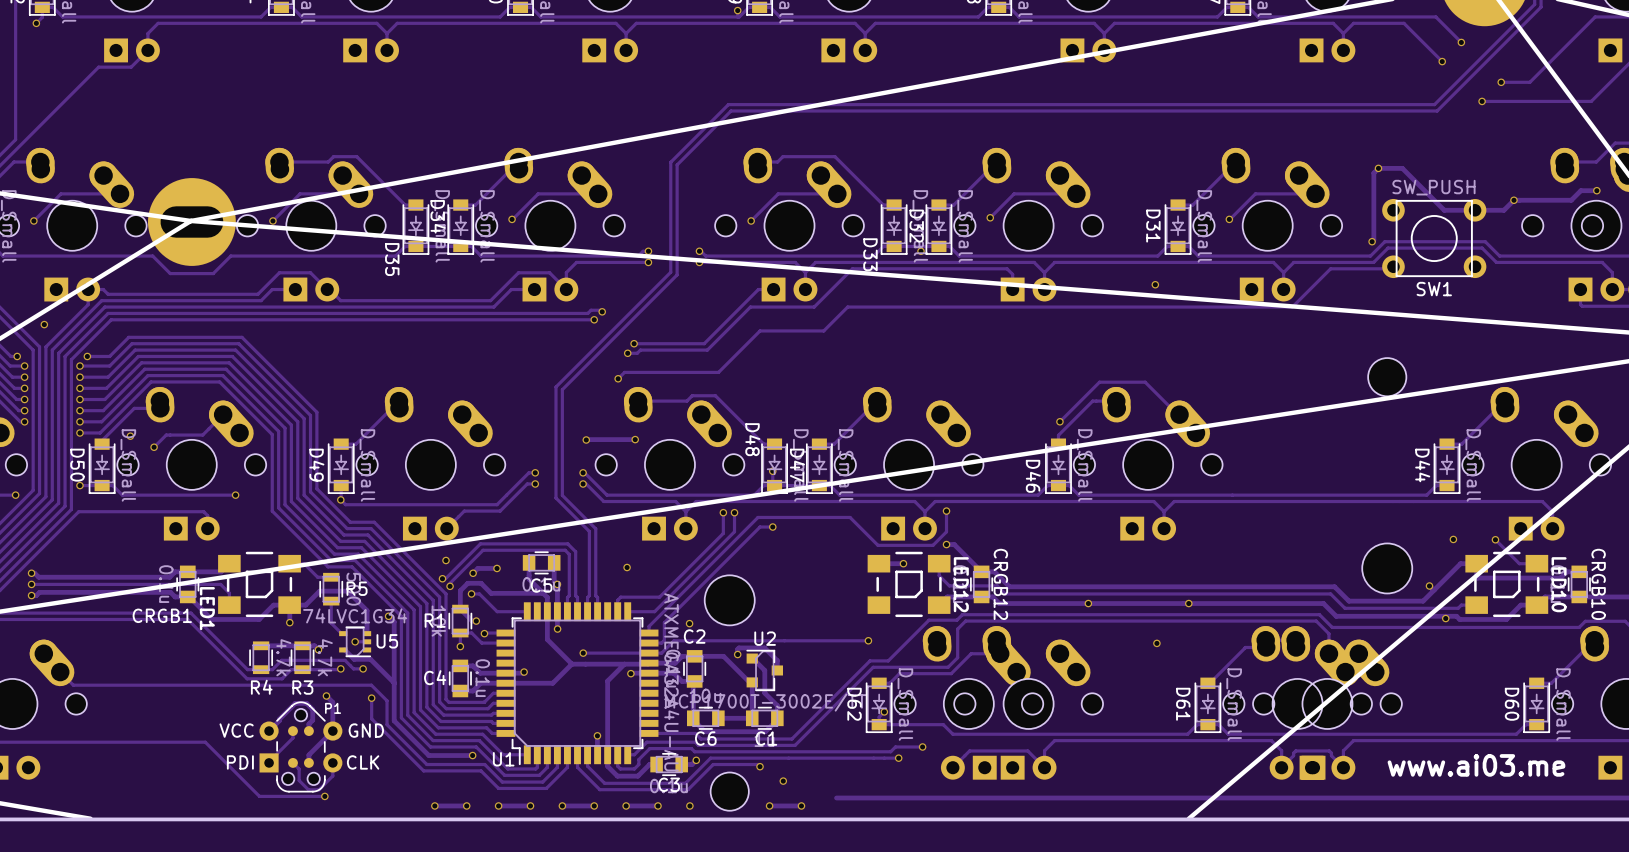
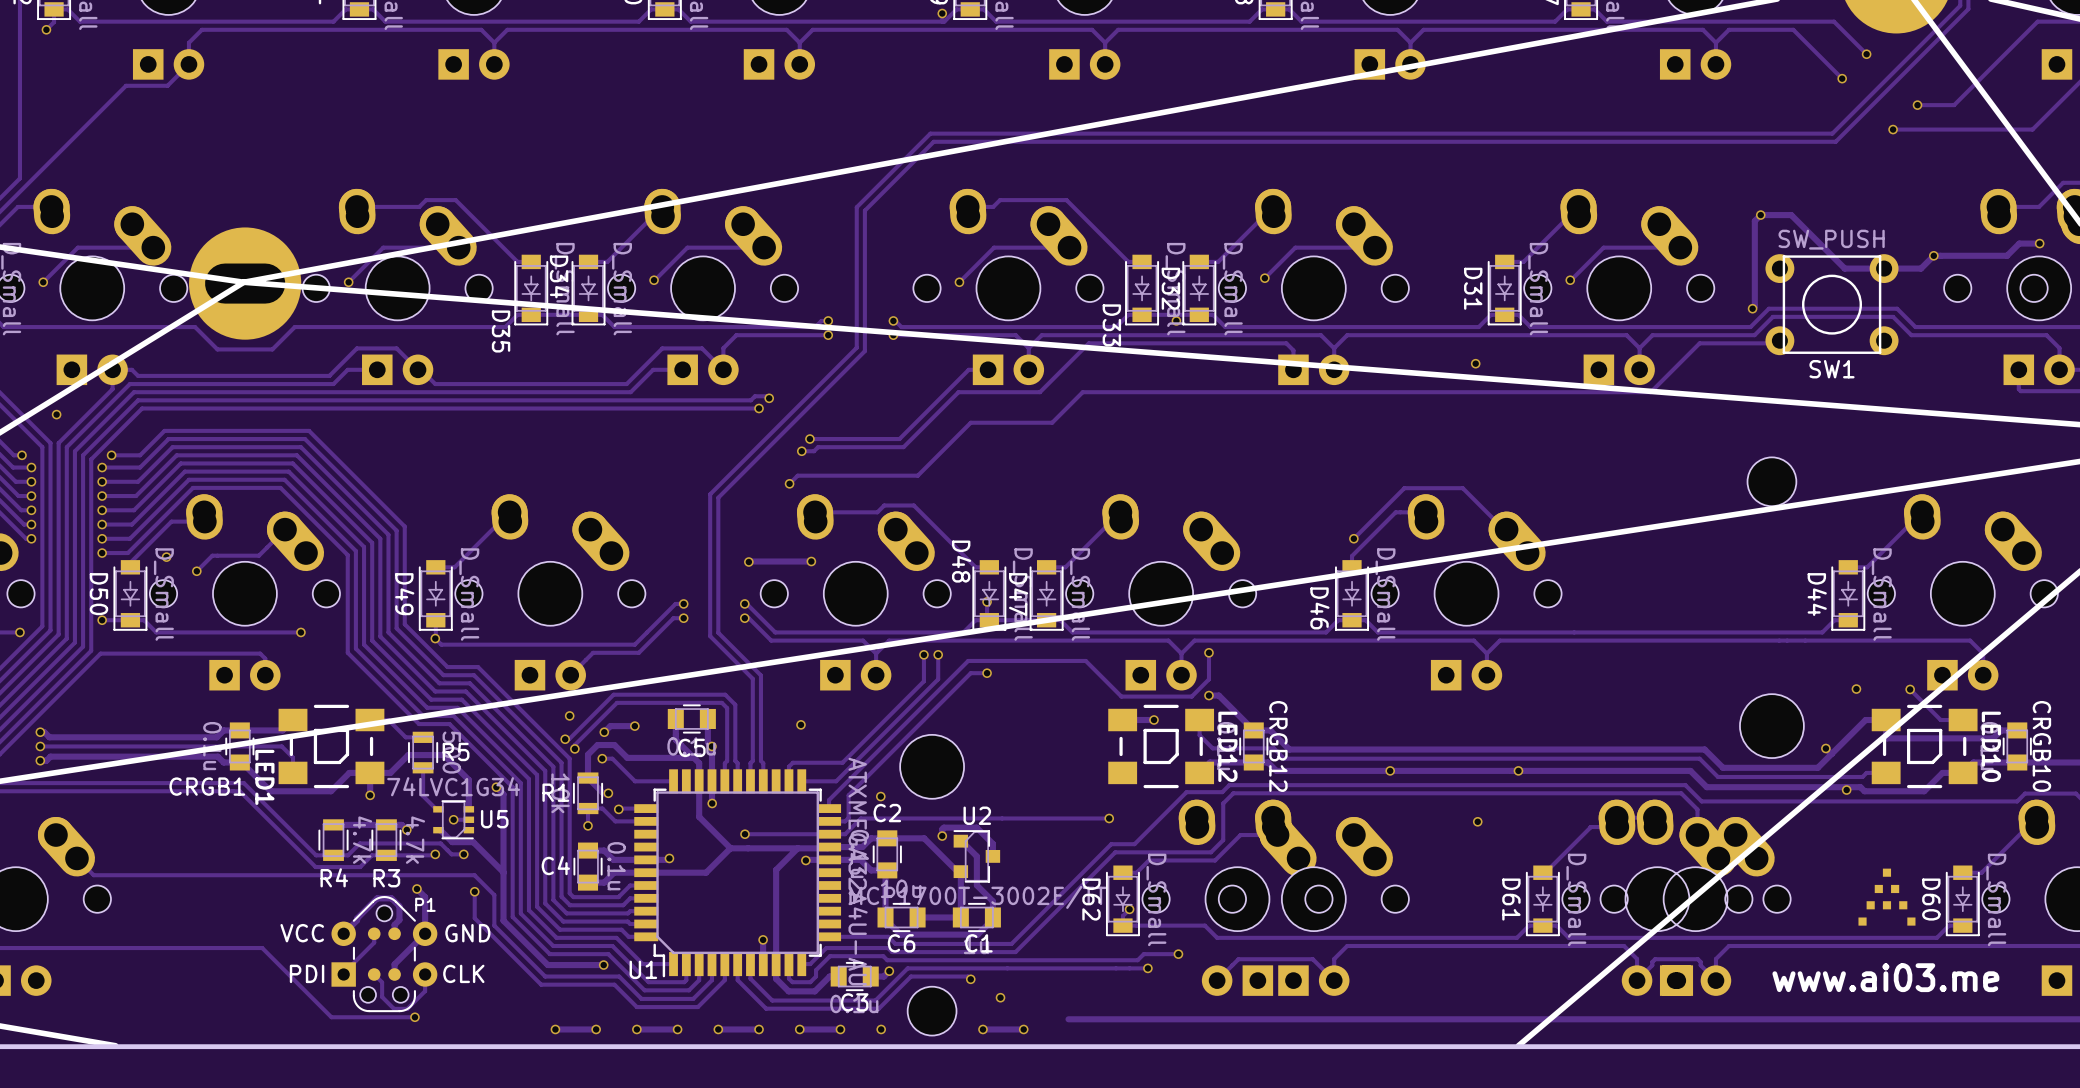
part: none -> (1886, 897)

